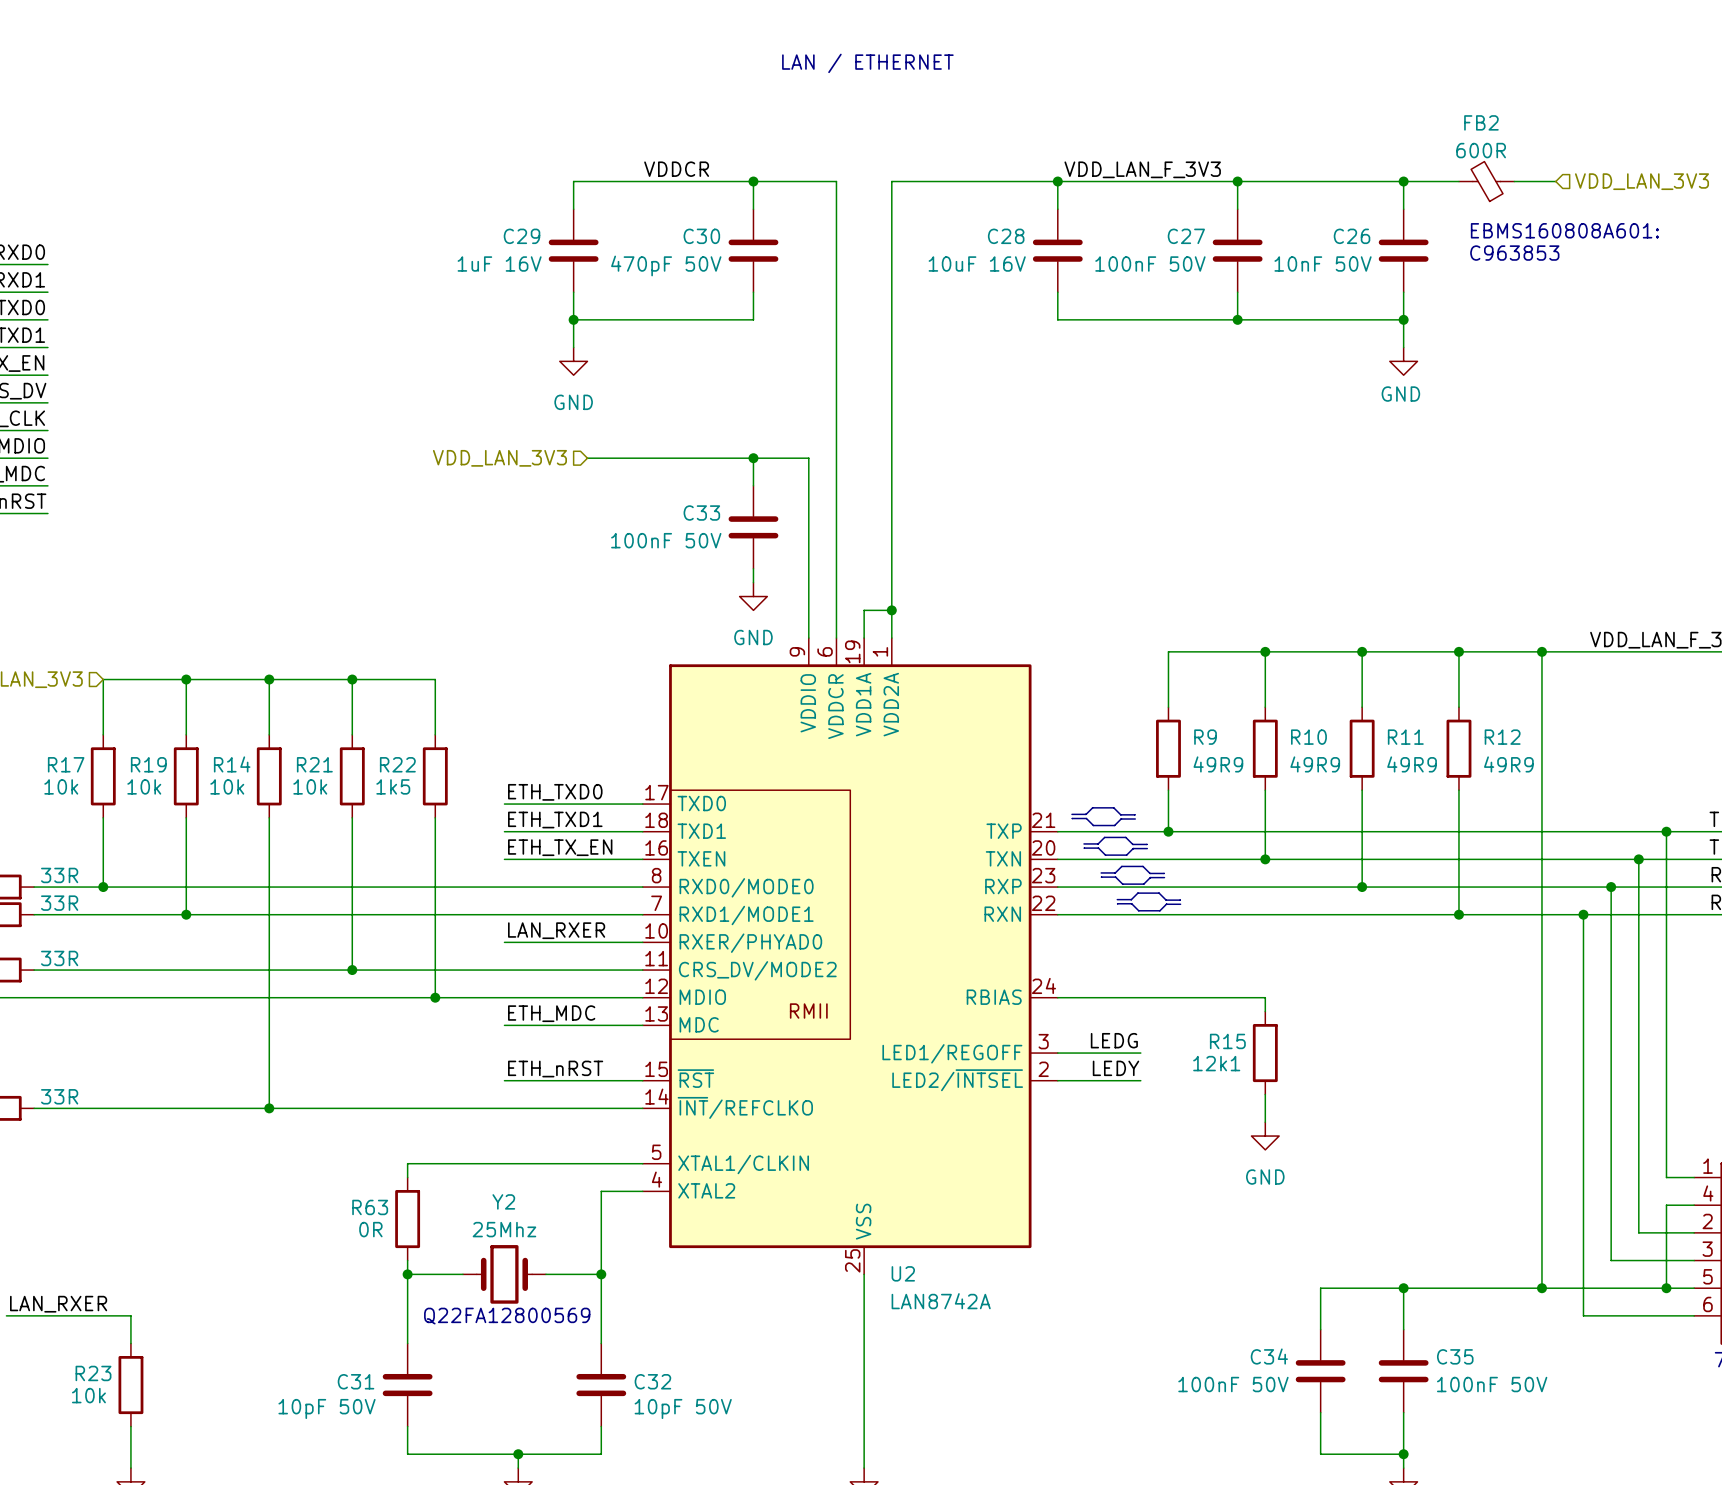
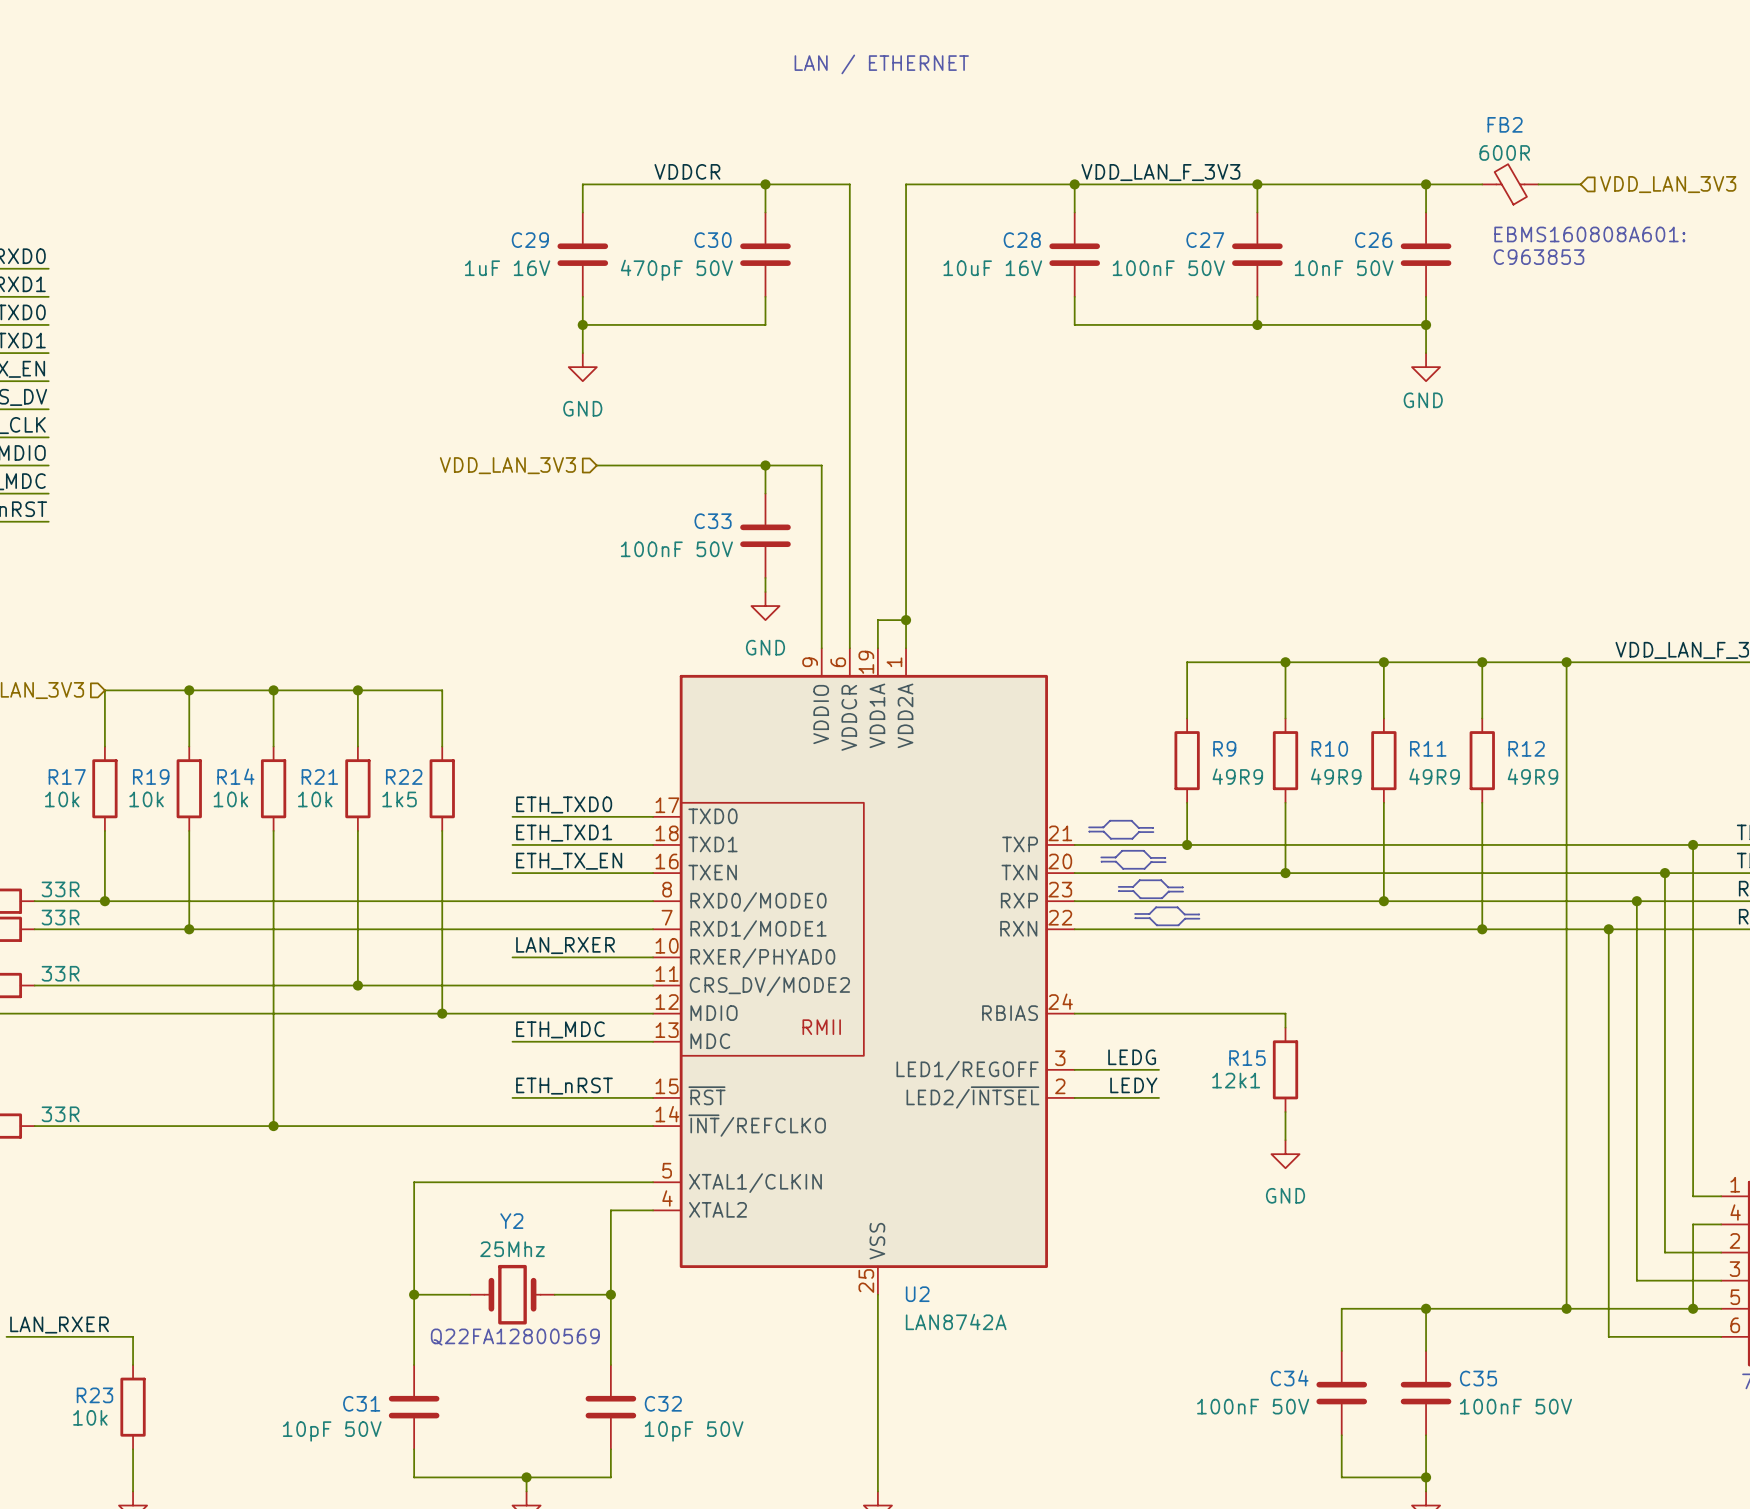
wire: none -> (414, 1196) (414, 1280)
R63: 0R (407, 1219) -> none

